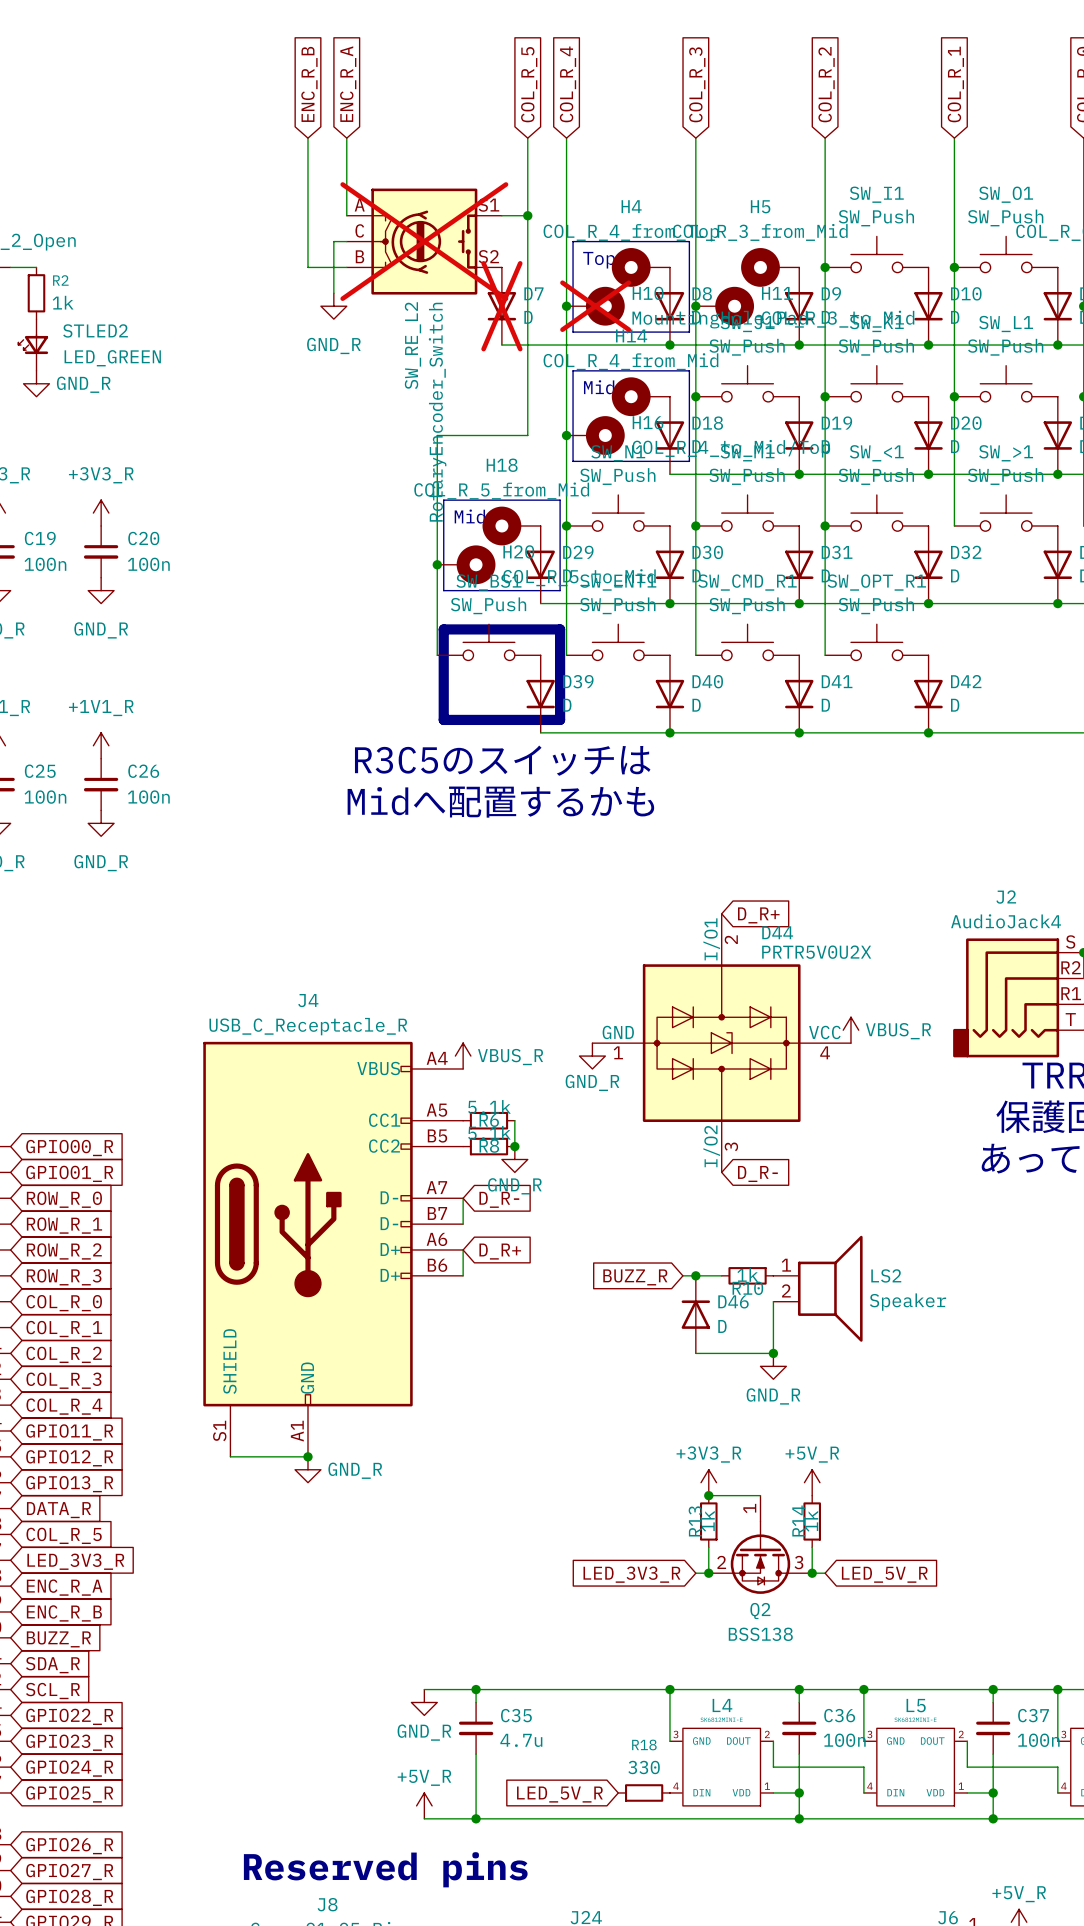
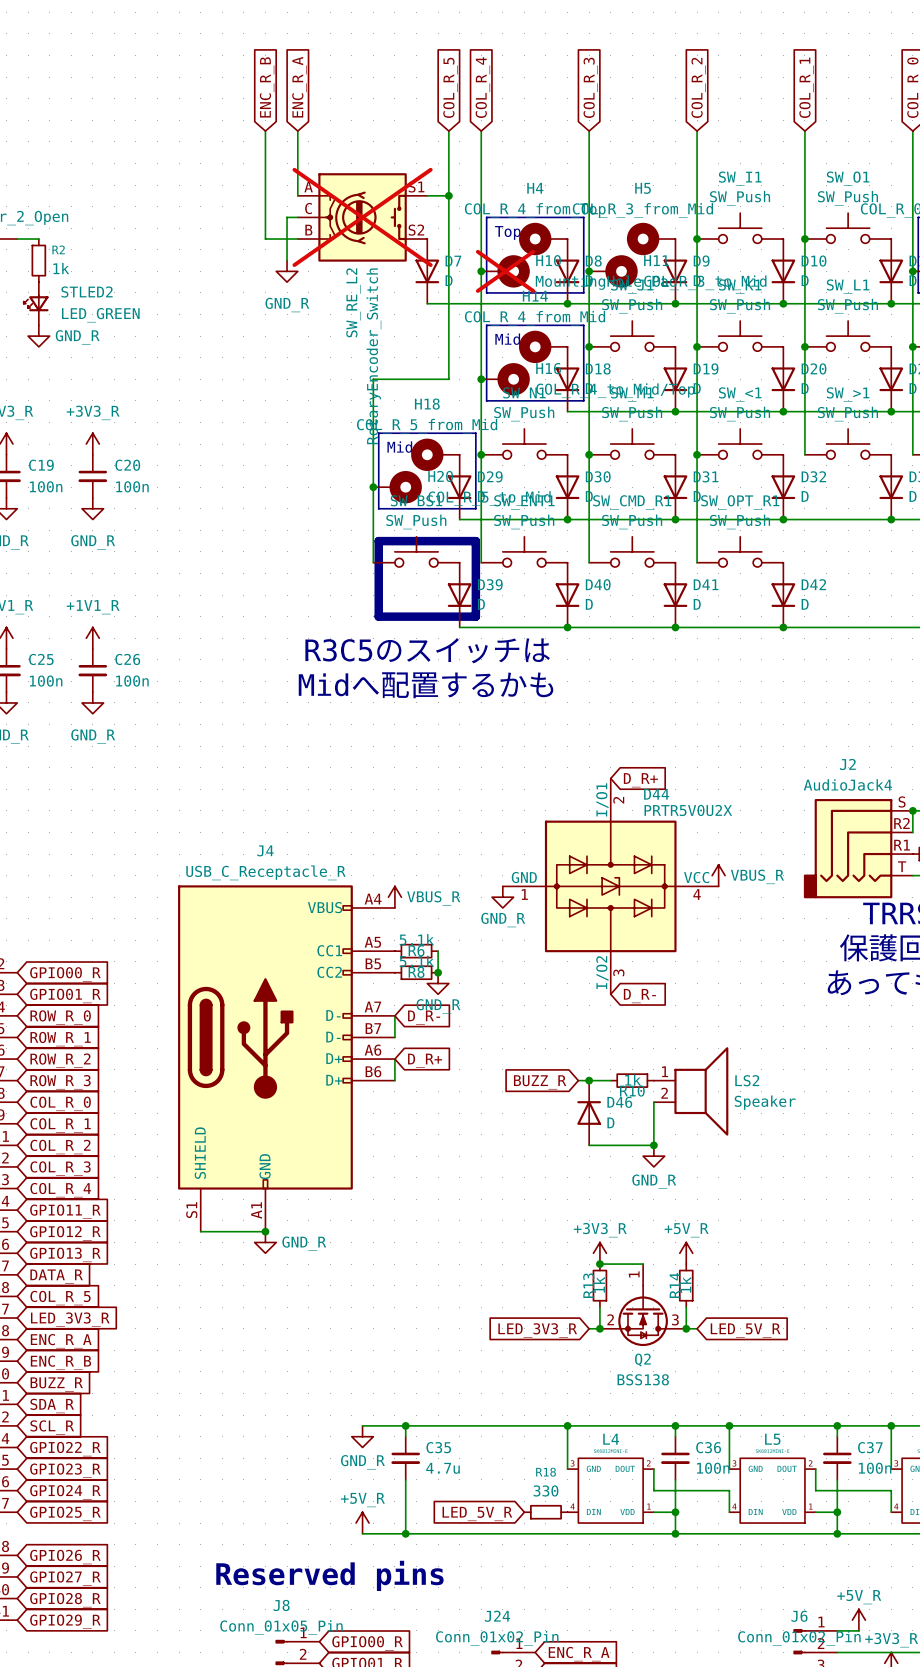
D7 do-not-place cross: (501, 306) -> none

